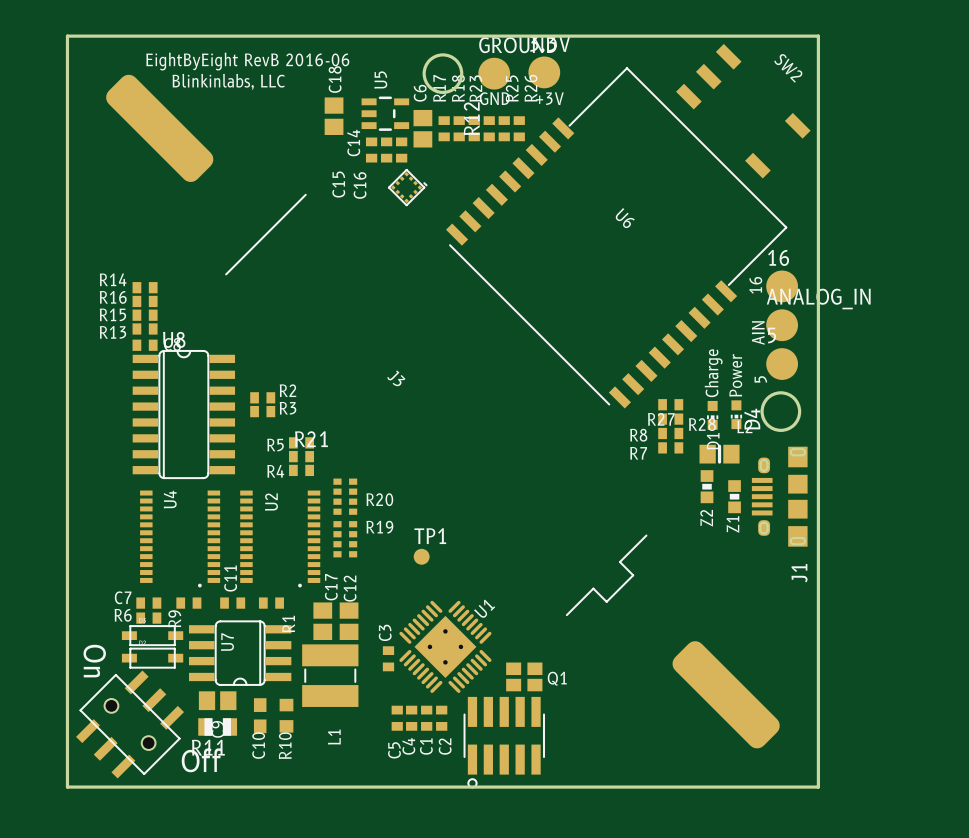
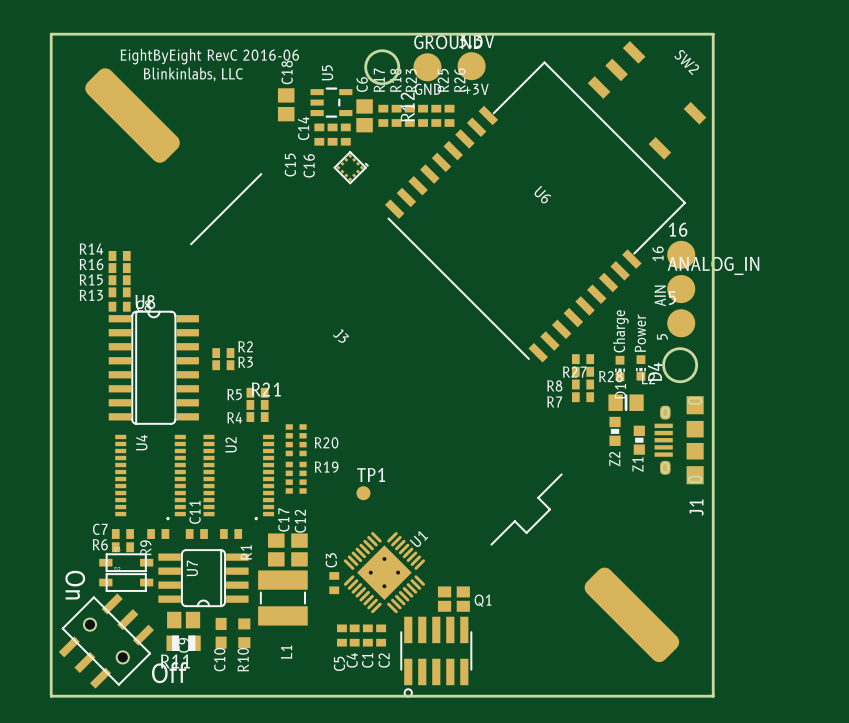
text: EightByEight RevB 2016-06 (247, 61) -> EightByEight RevC 2016-06 (209, 56)

